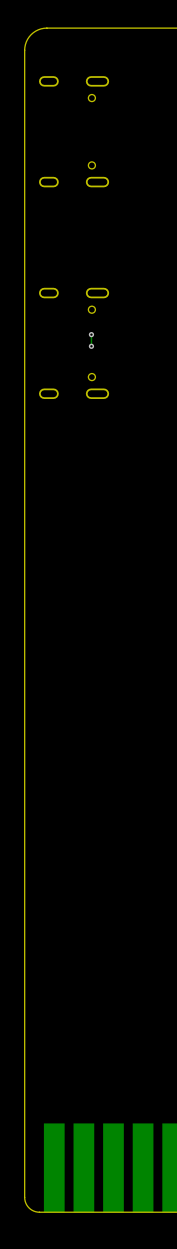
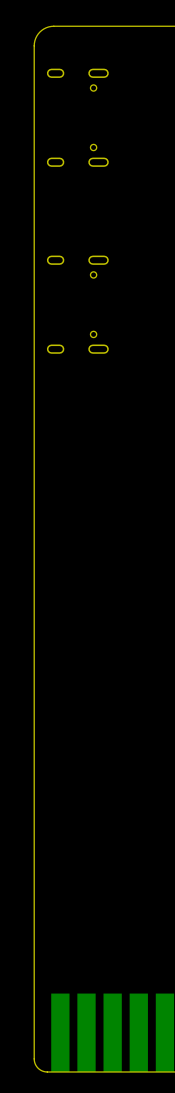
track: (91, 334) (91, 346) -> none
via: (91, 334) -> none
via: (91, 346) -> none

